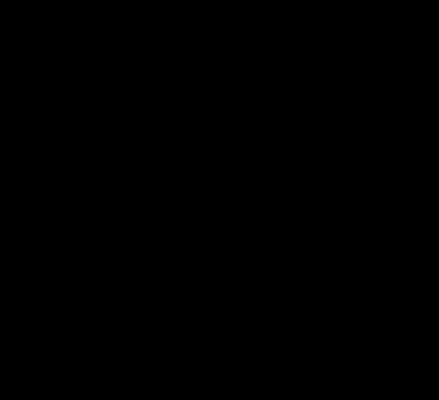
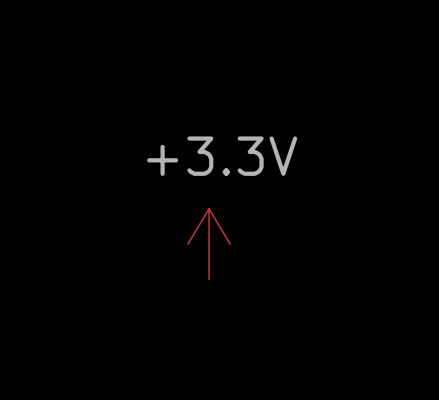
power symbol: none -> +3.3V (209, 244)

